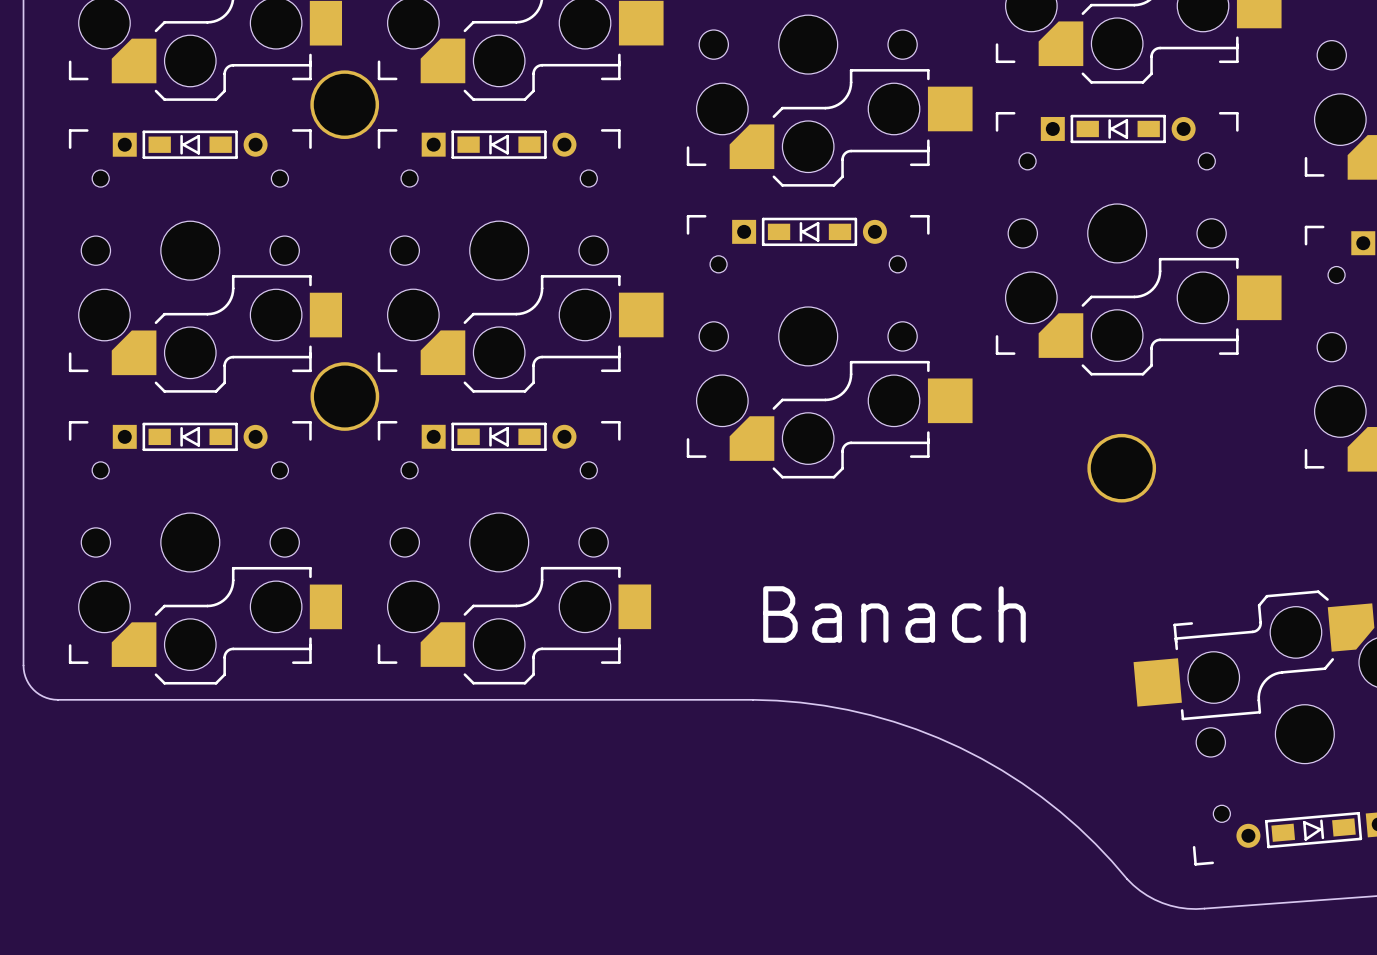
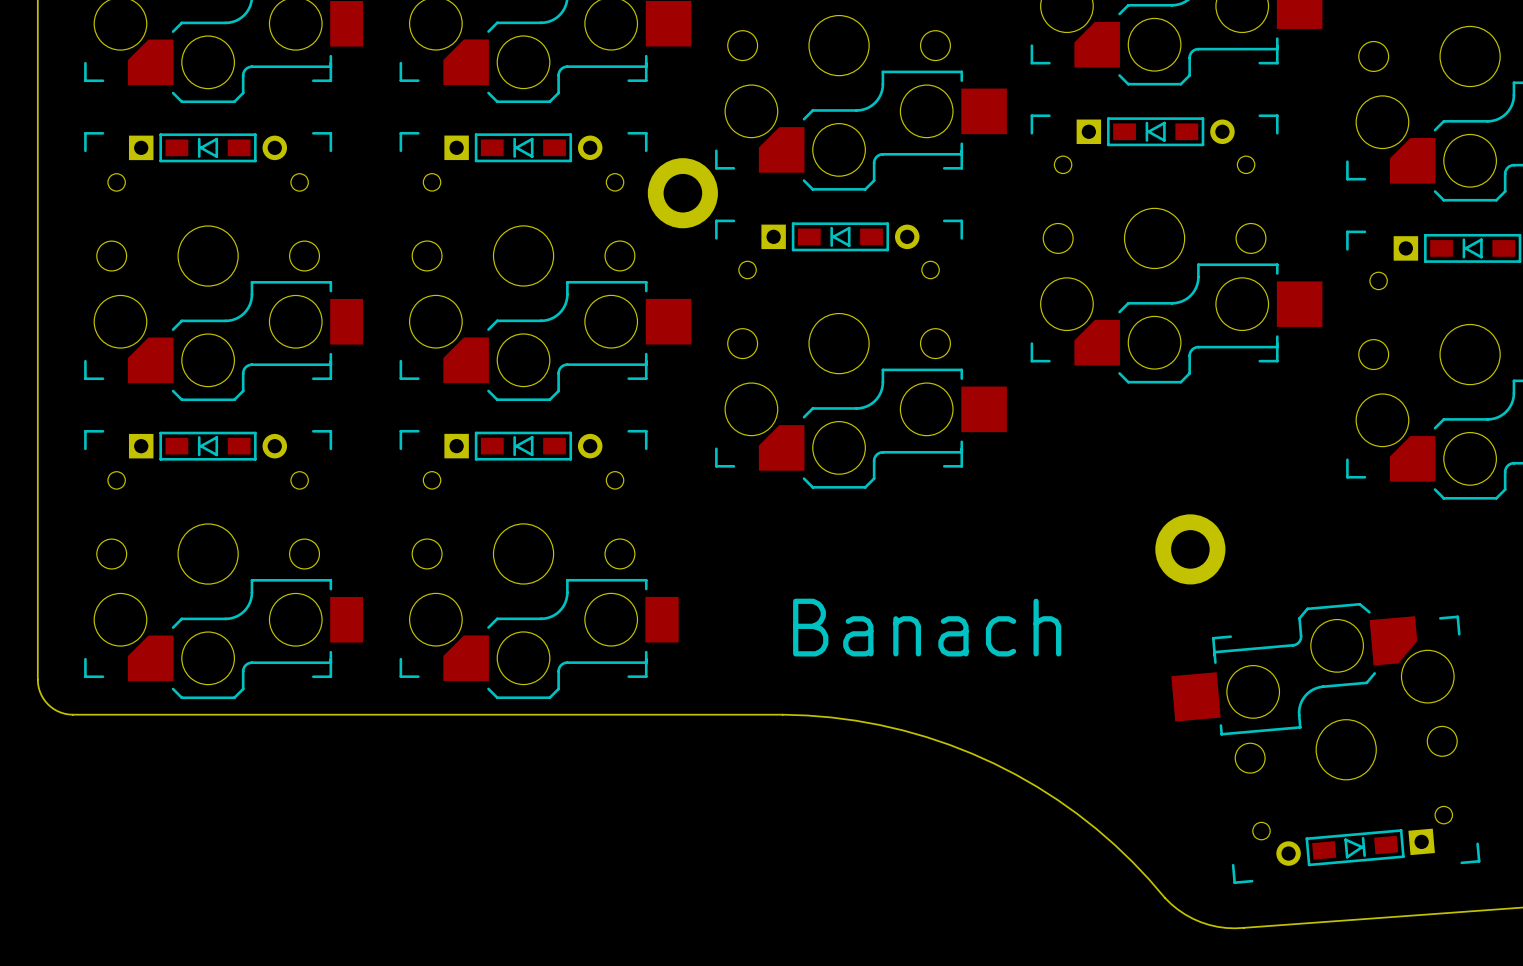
part: (344, 104) -> none
part: none -> (682, 193)
part: (344, 396) -> none
part: (1121, 468) -> none
part: none -> (1190, 549)

